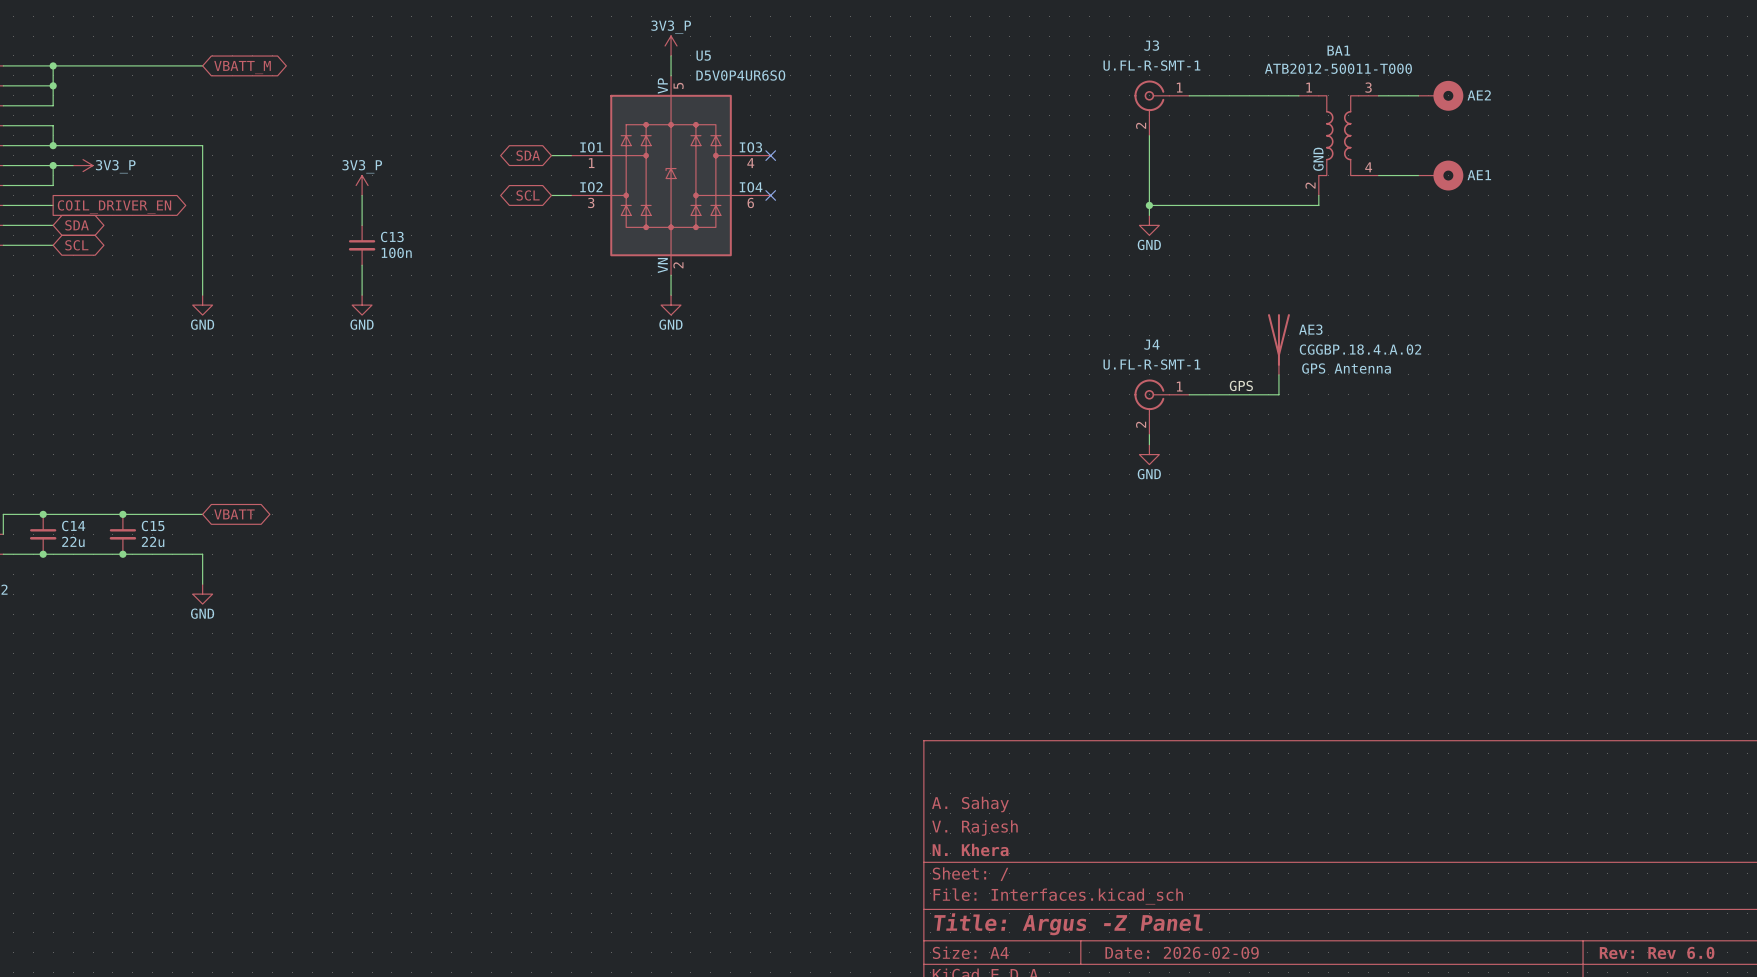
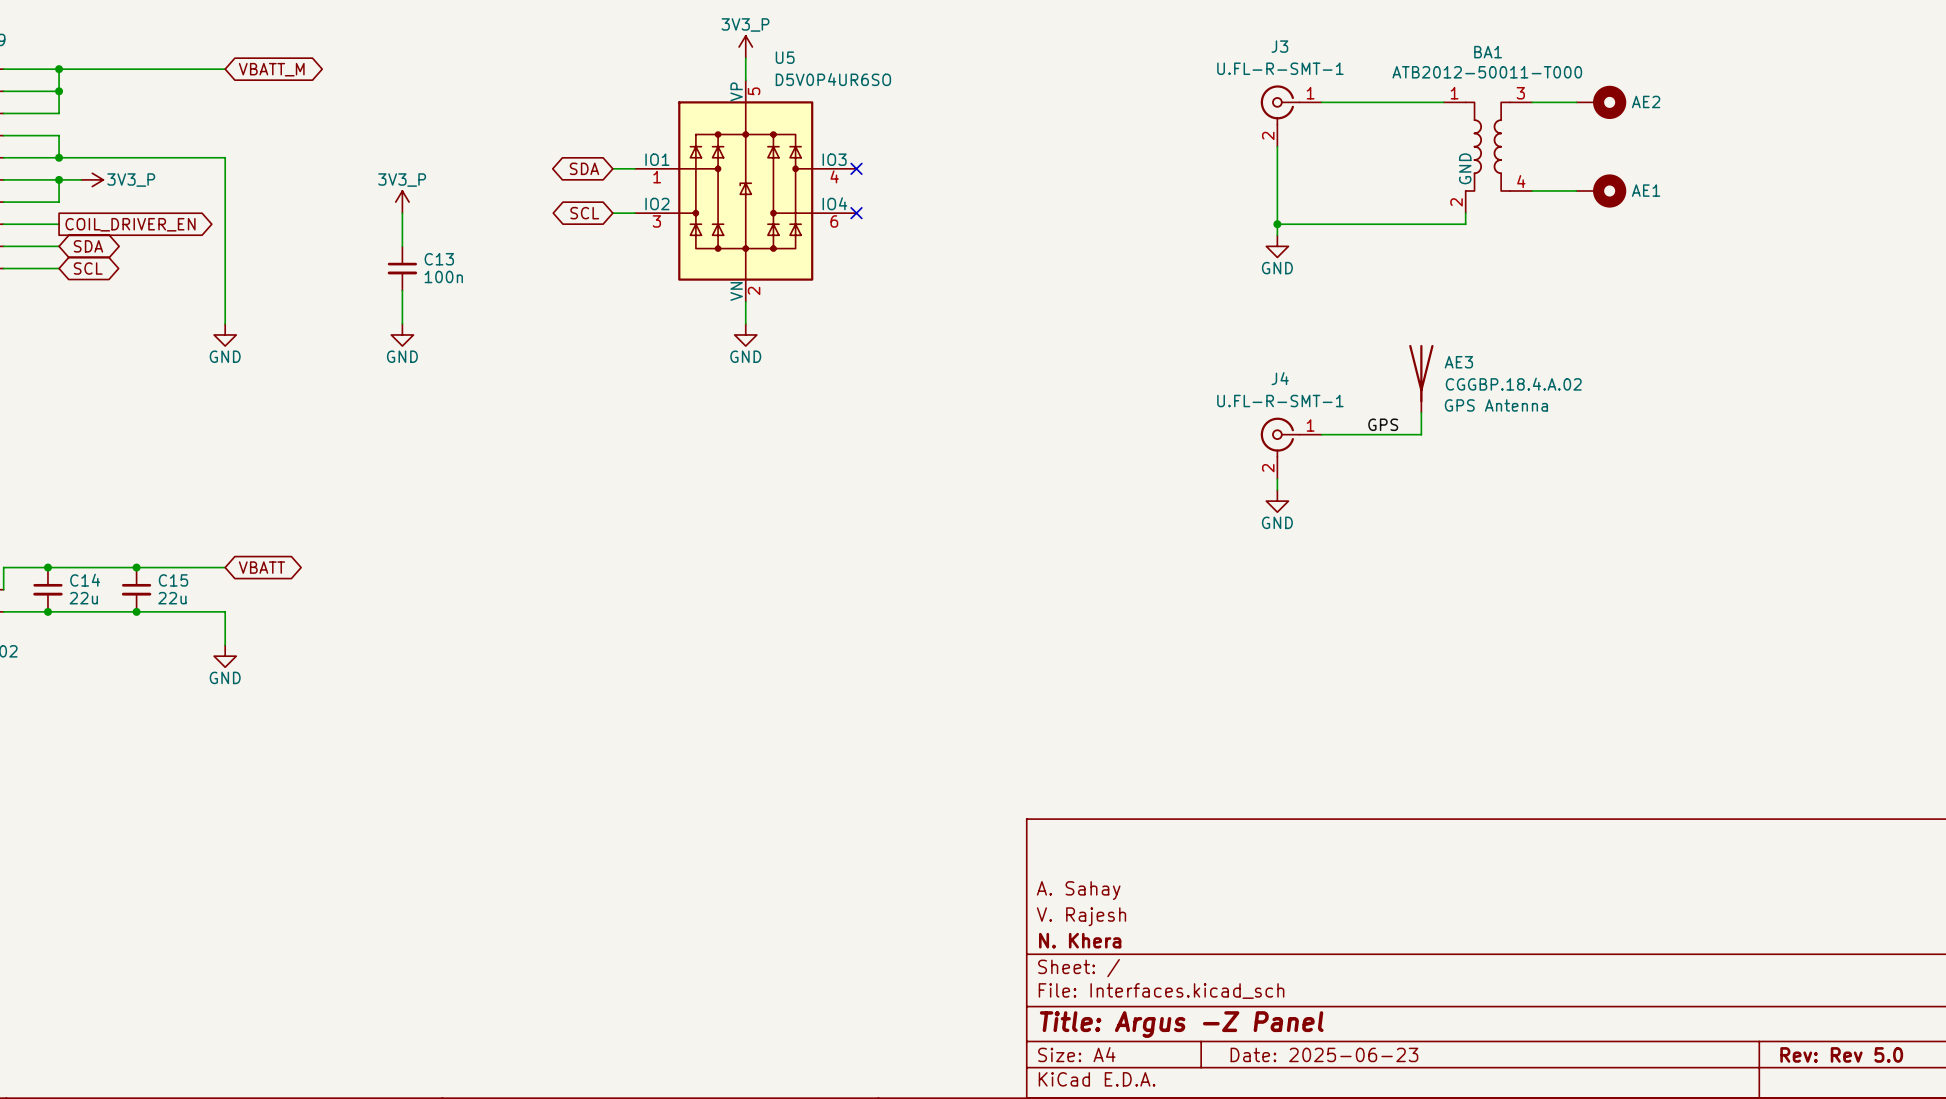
title block: Date: 2026-02-09 (1182, 952) -> Date: 2025-06-23 (1324, 1054)
title block: Rev: Rev 6.0 (1657, 952) -> Rev: Rev 5.0 (1841, 1054)

